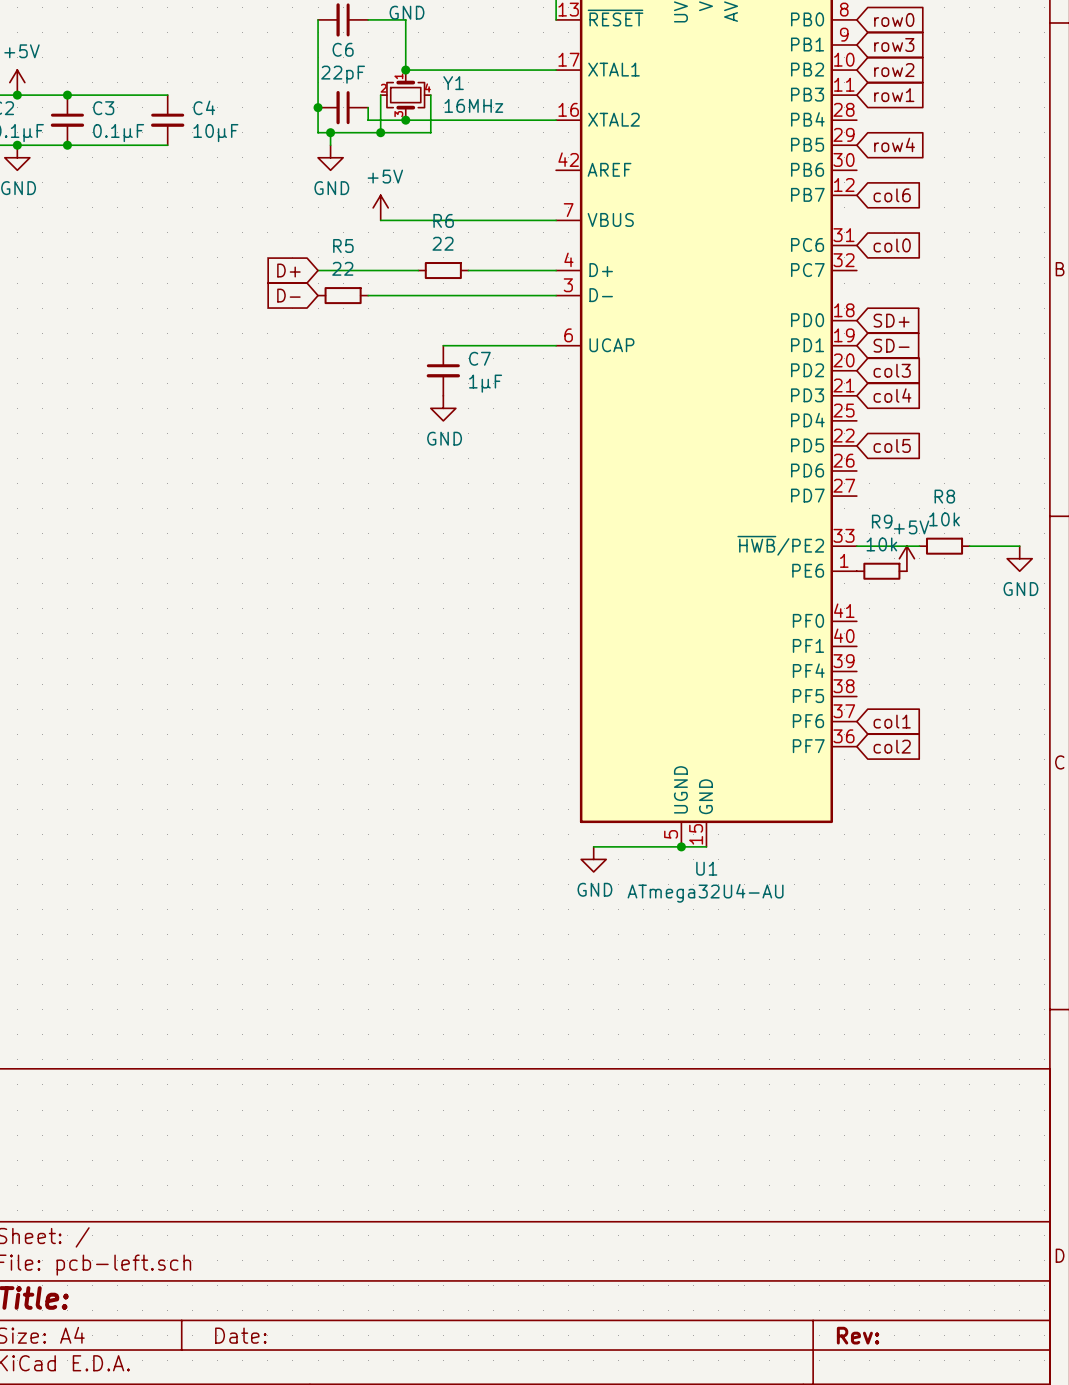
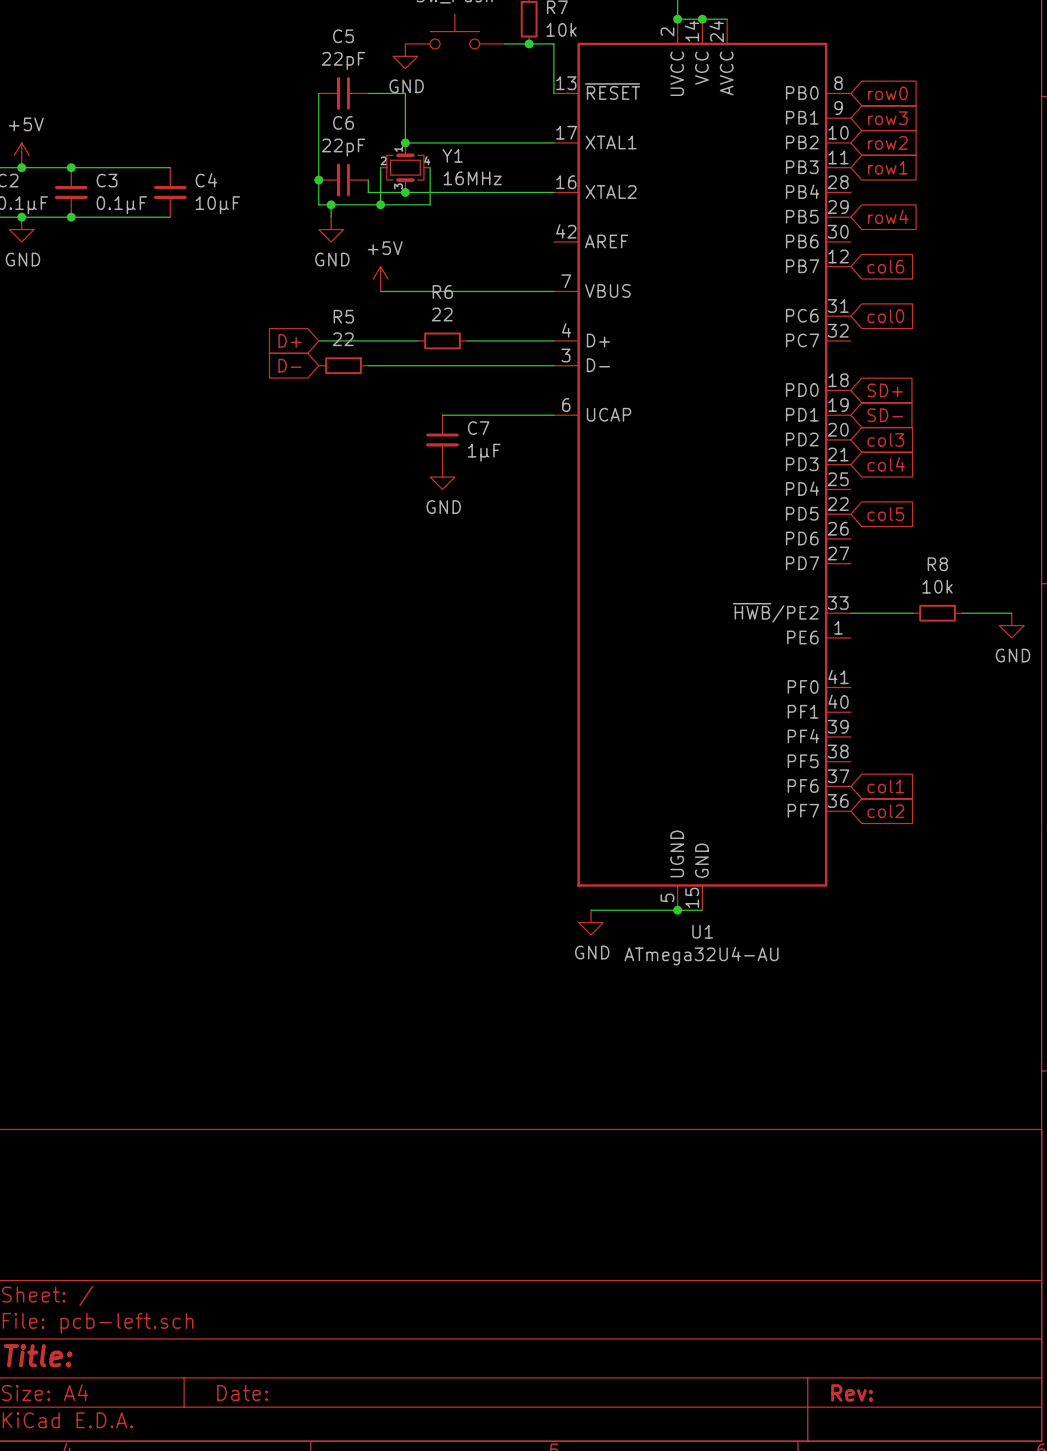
power symbol: +5V (906, 558) -> none
R9: 10k (881, 571) -> none

